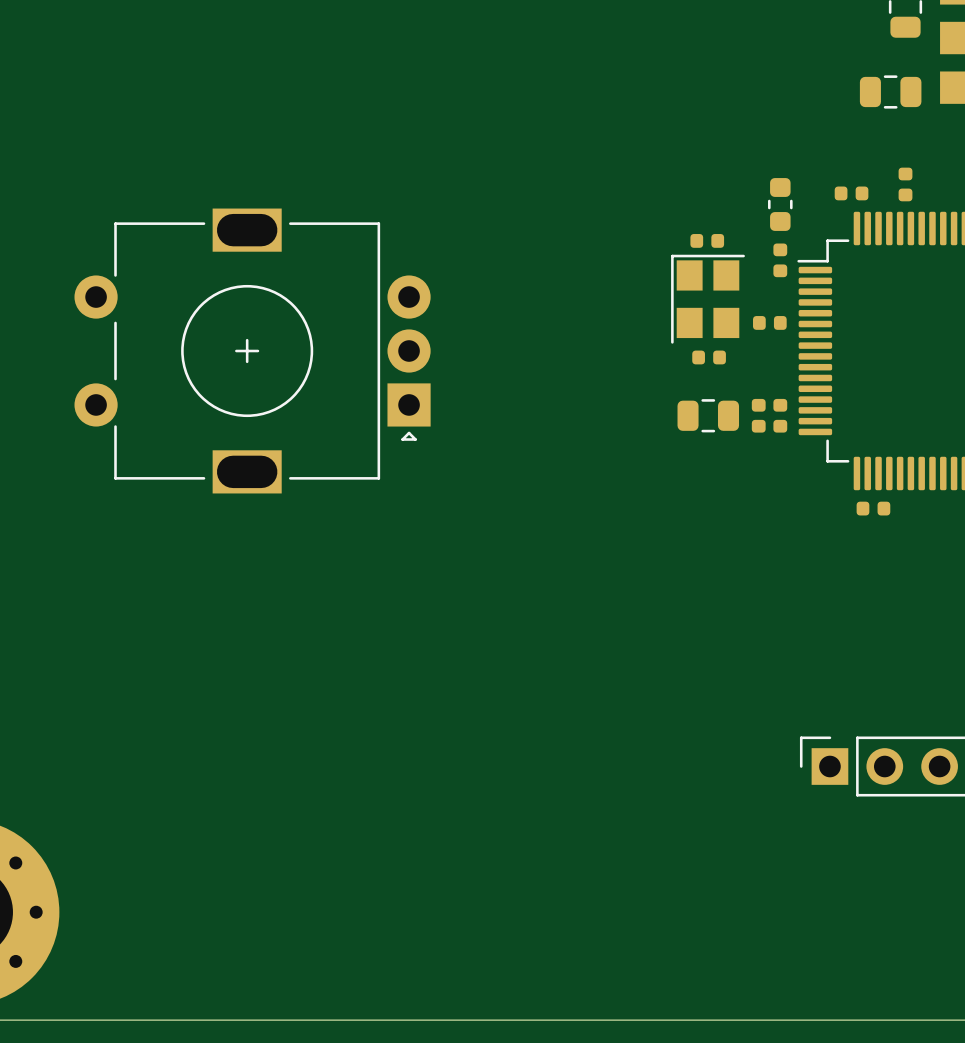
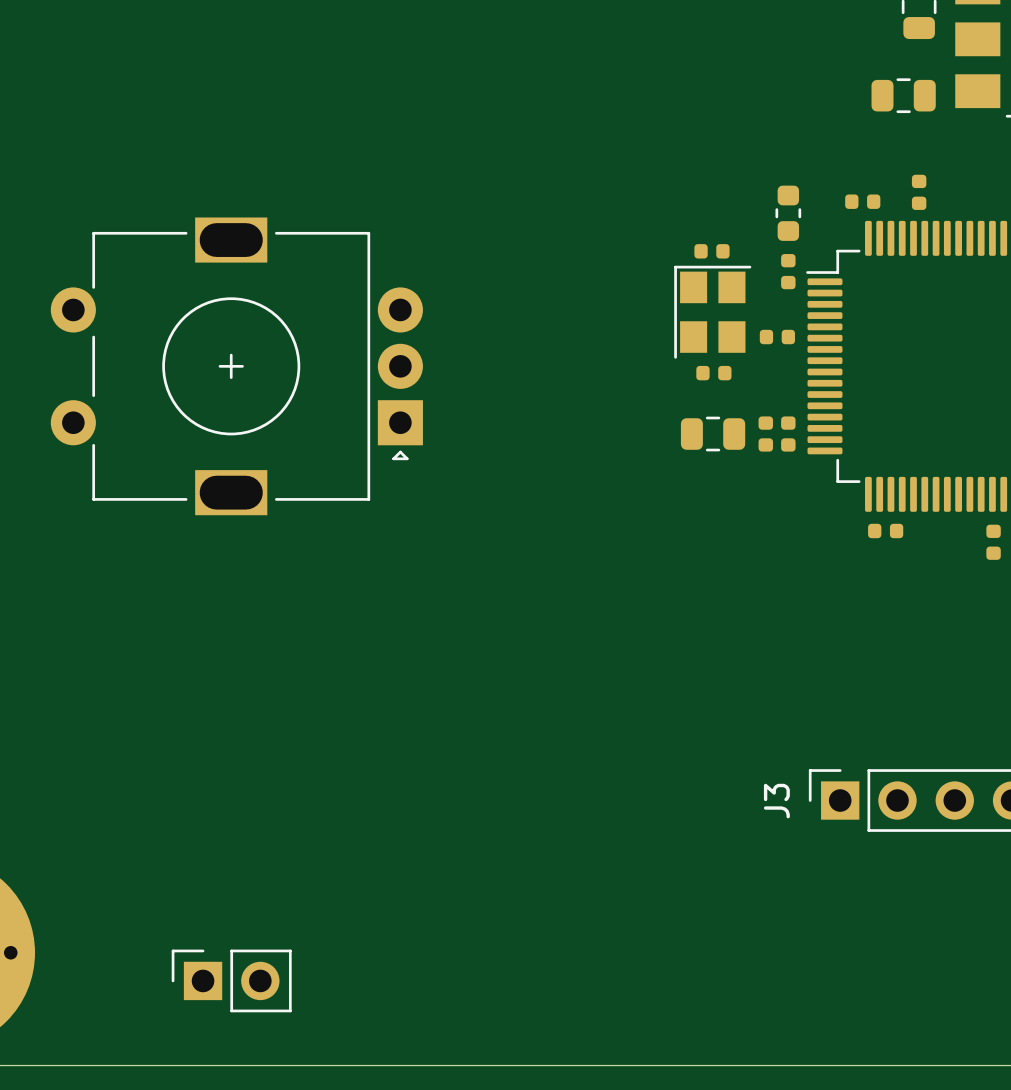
J3 name: none -> J3 (776, 801)
part: none -> (231, 980)

